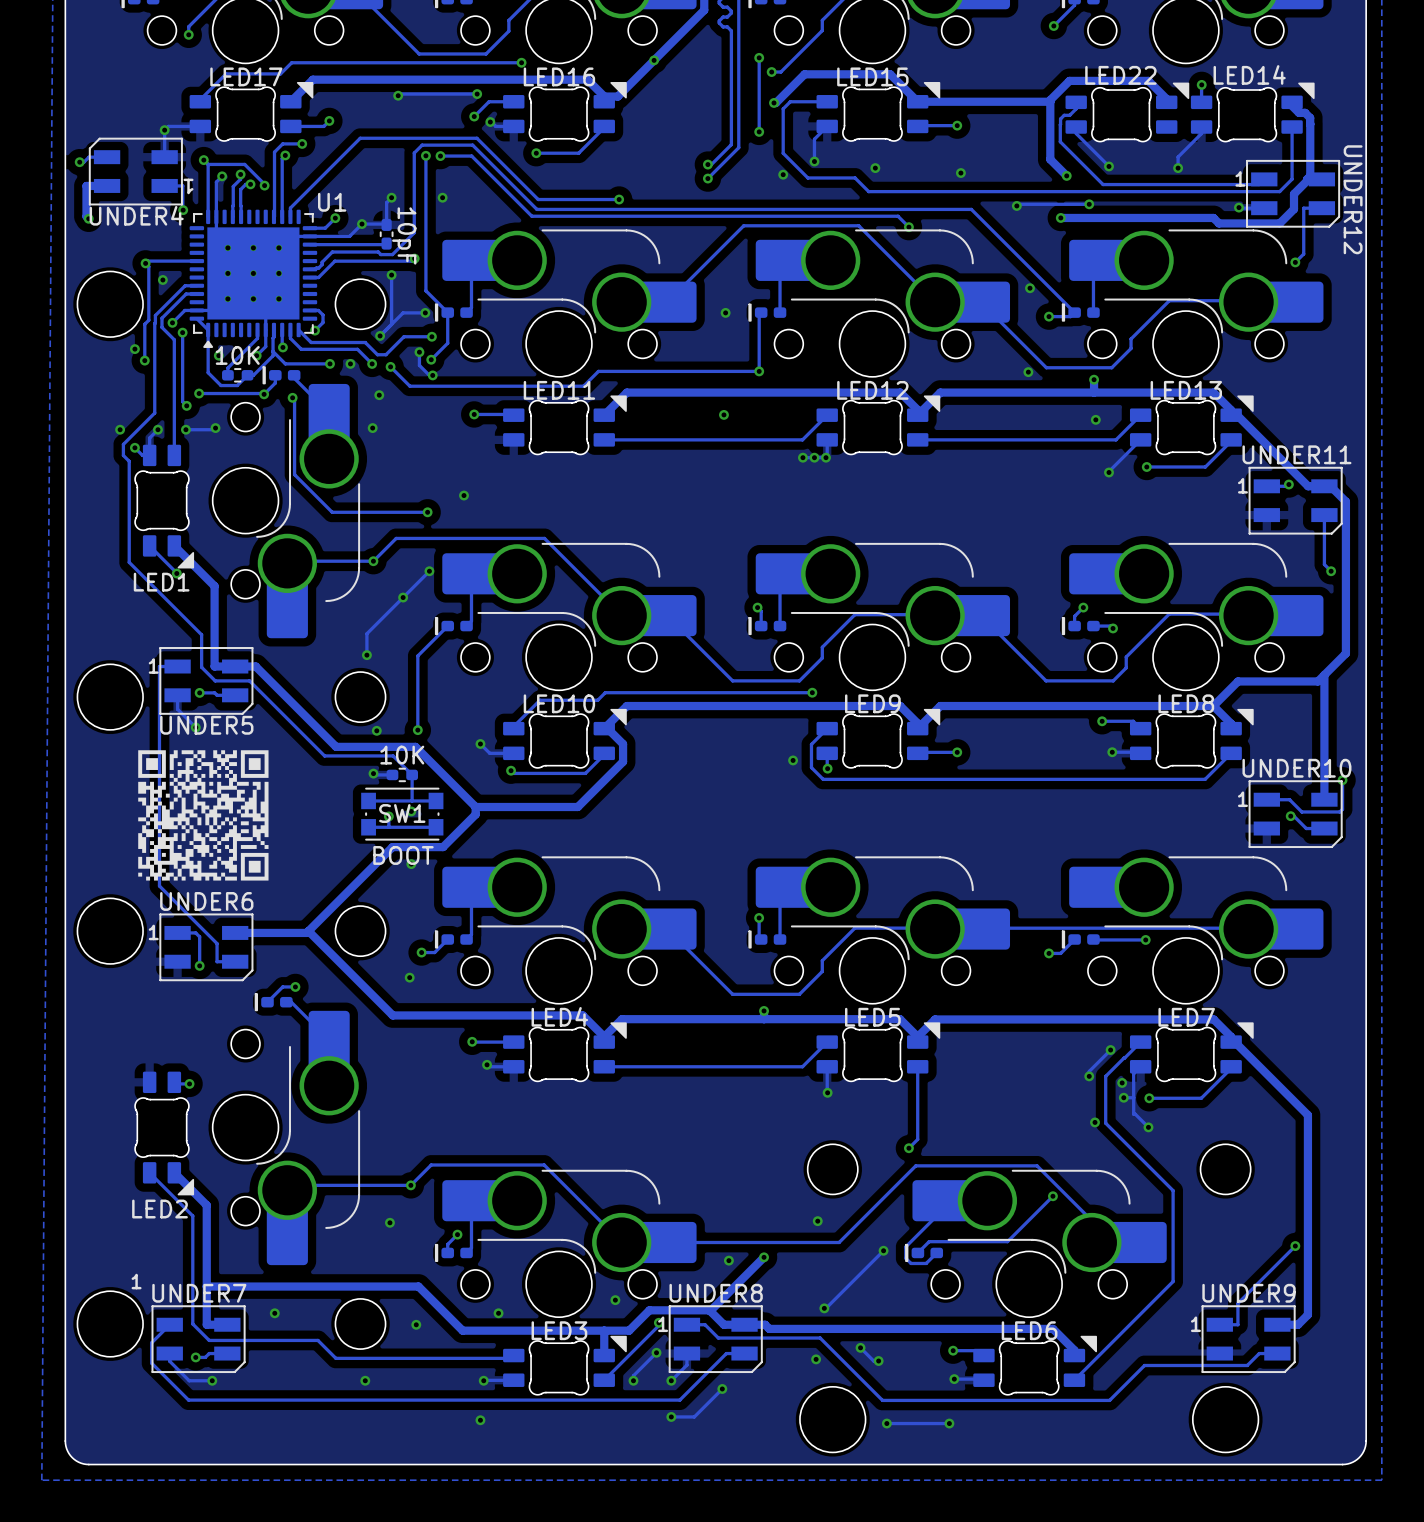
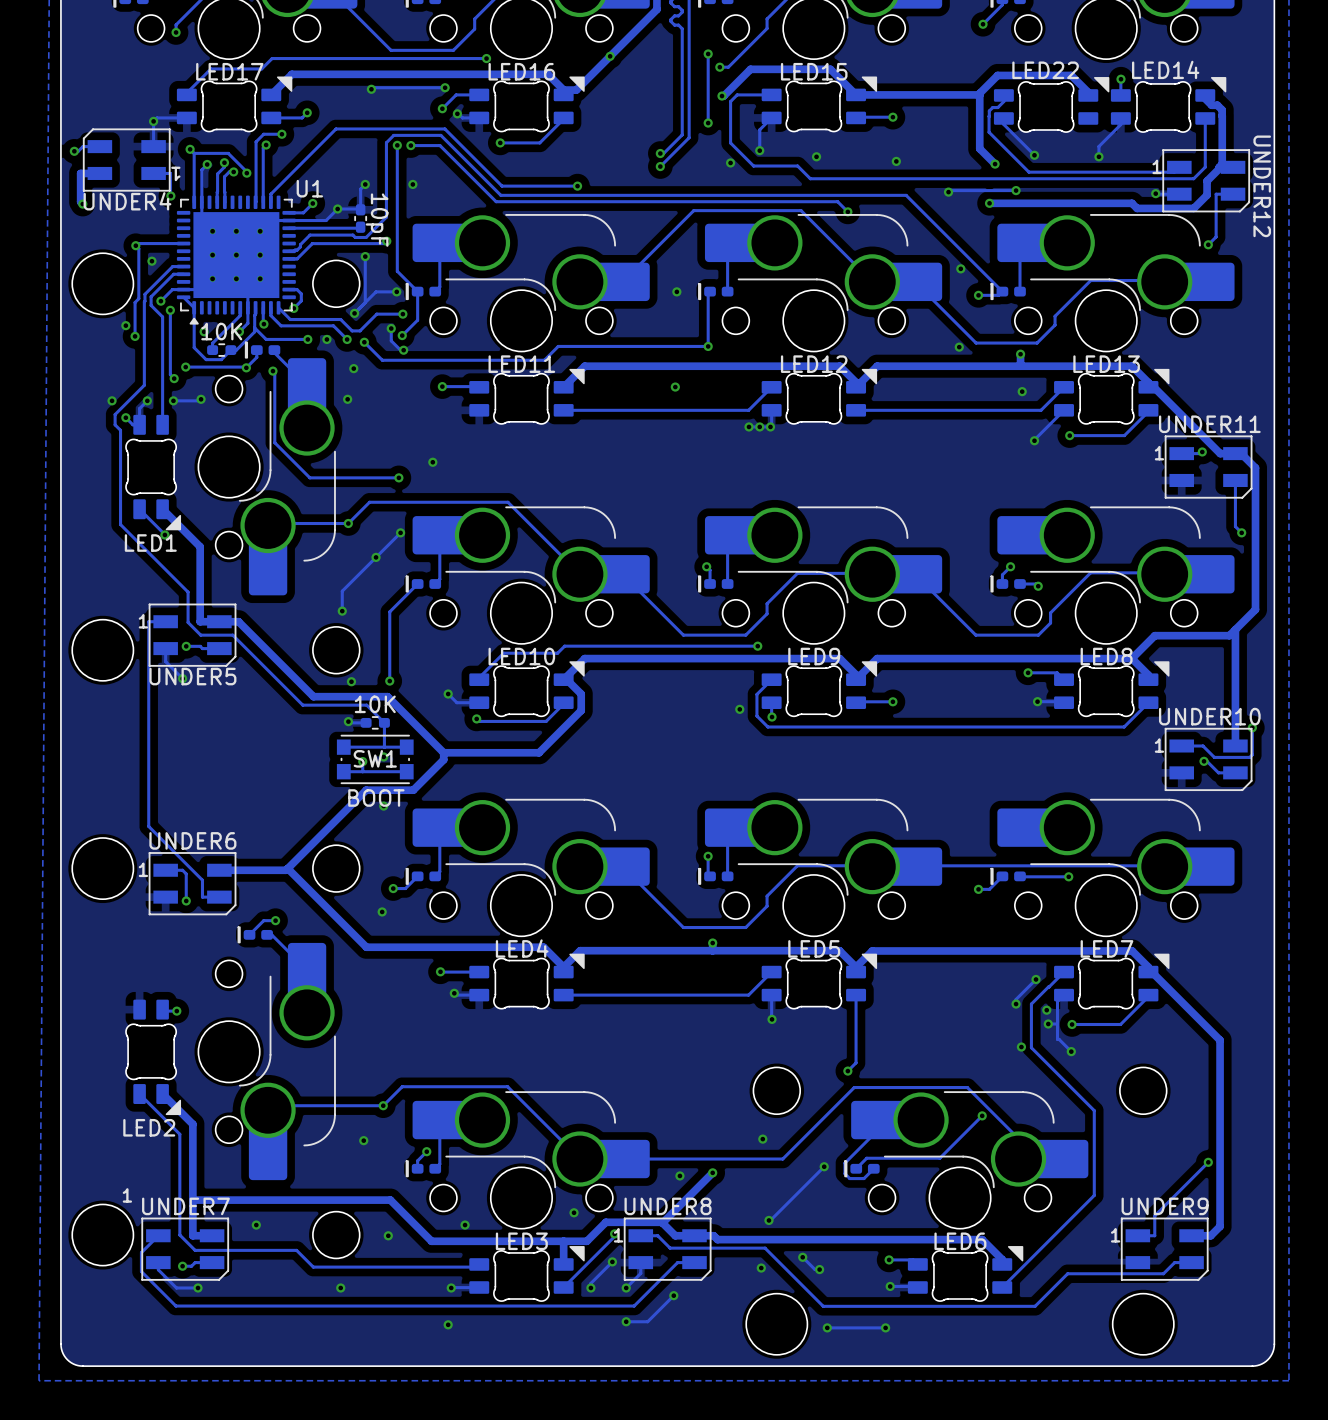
drawing: [138, 750, 269, 881] -> none

